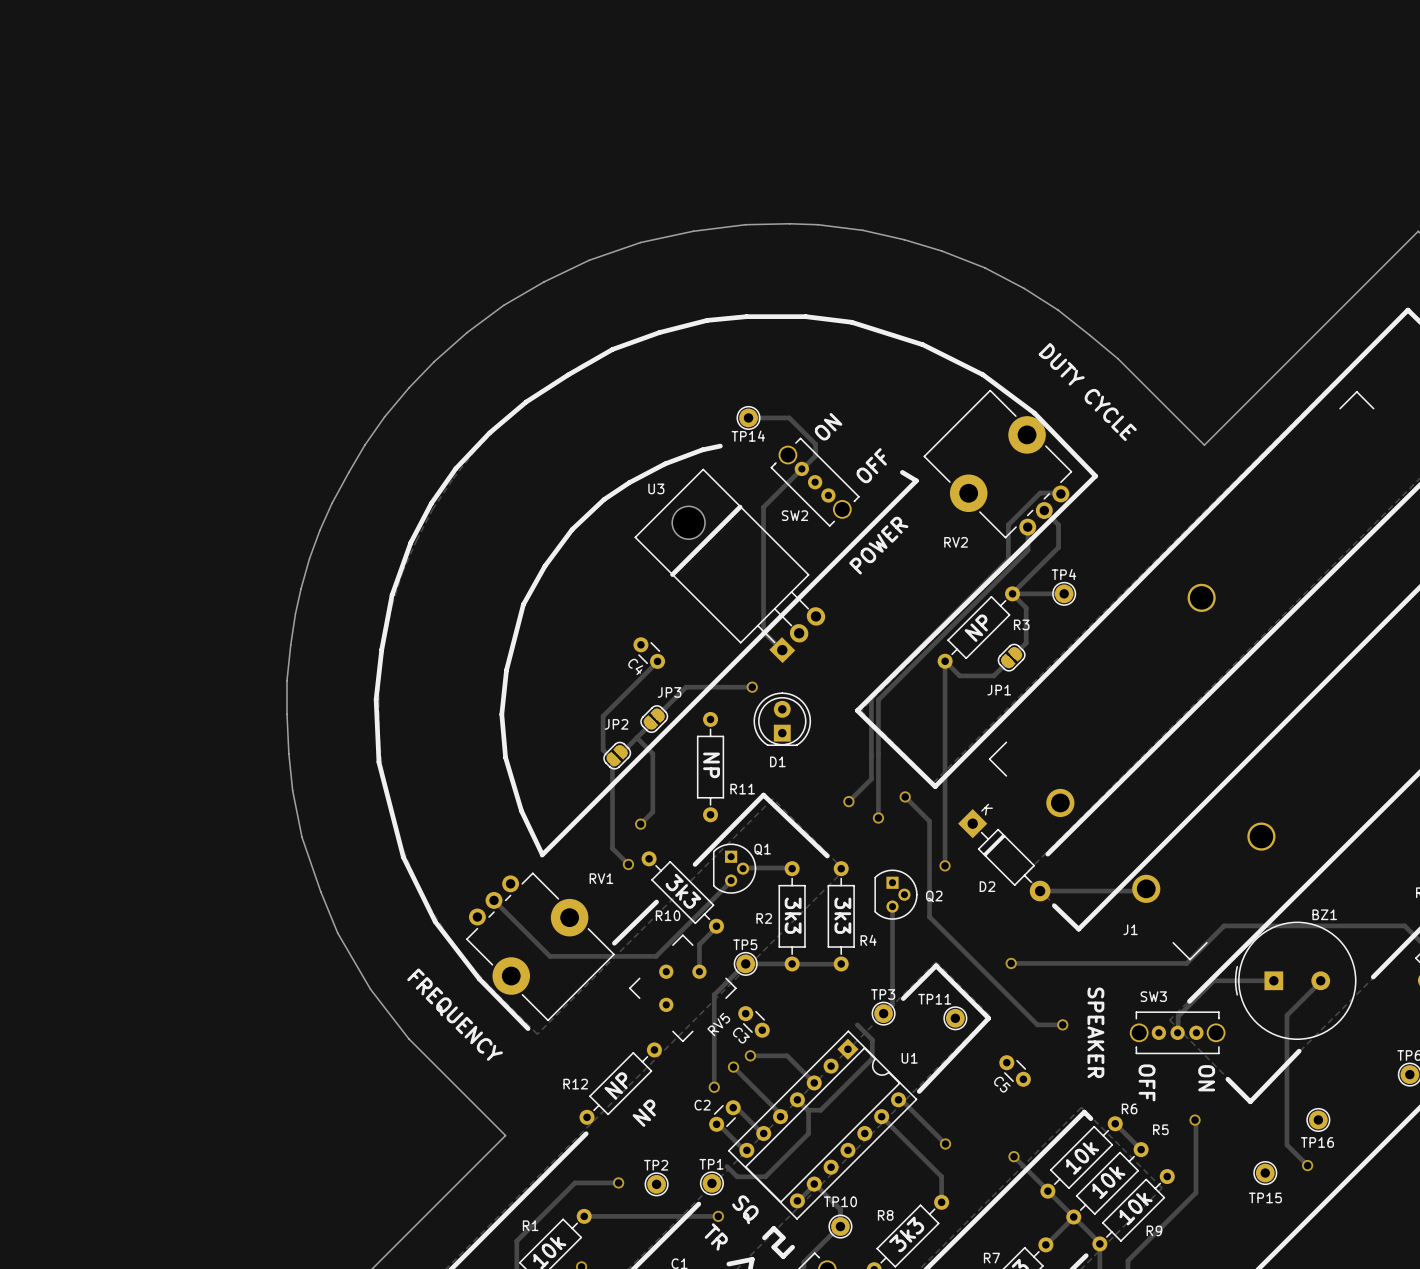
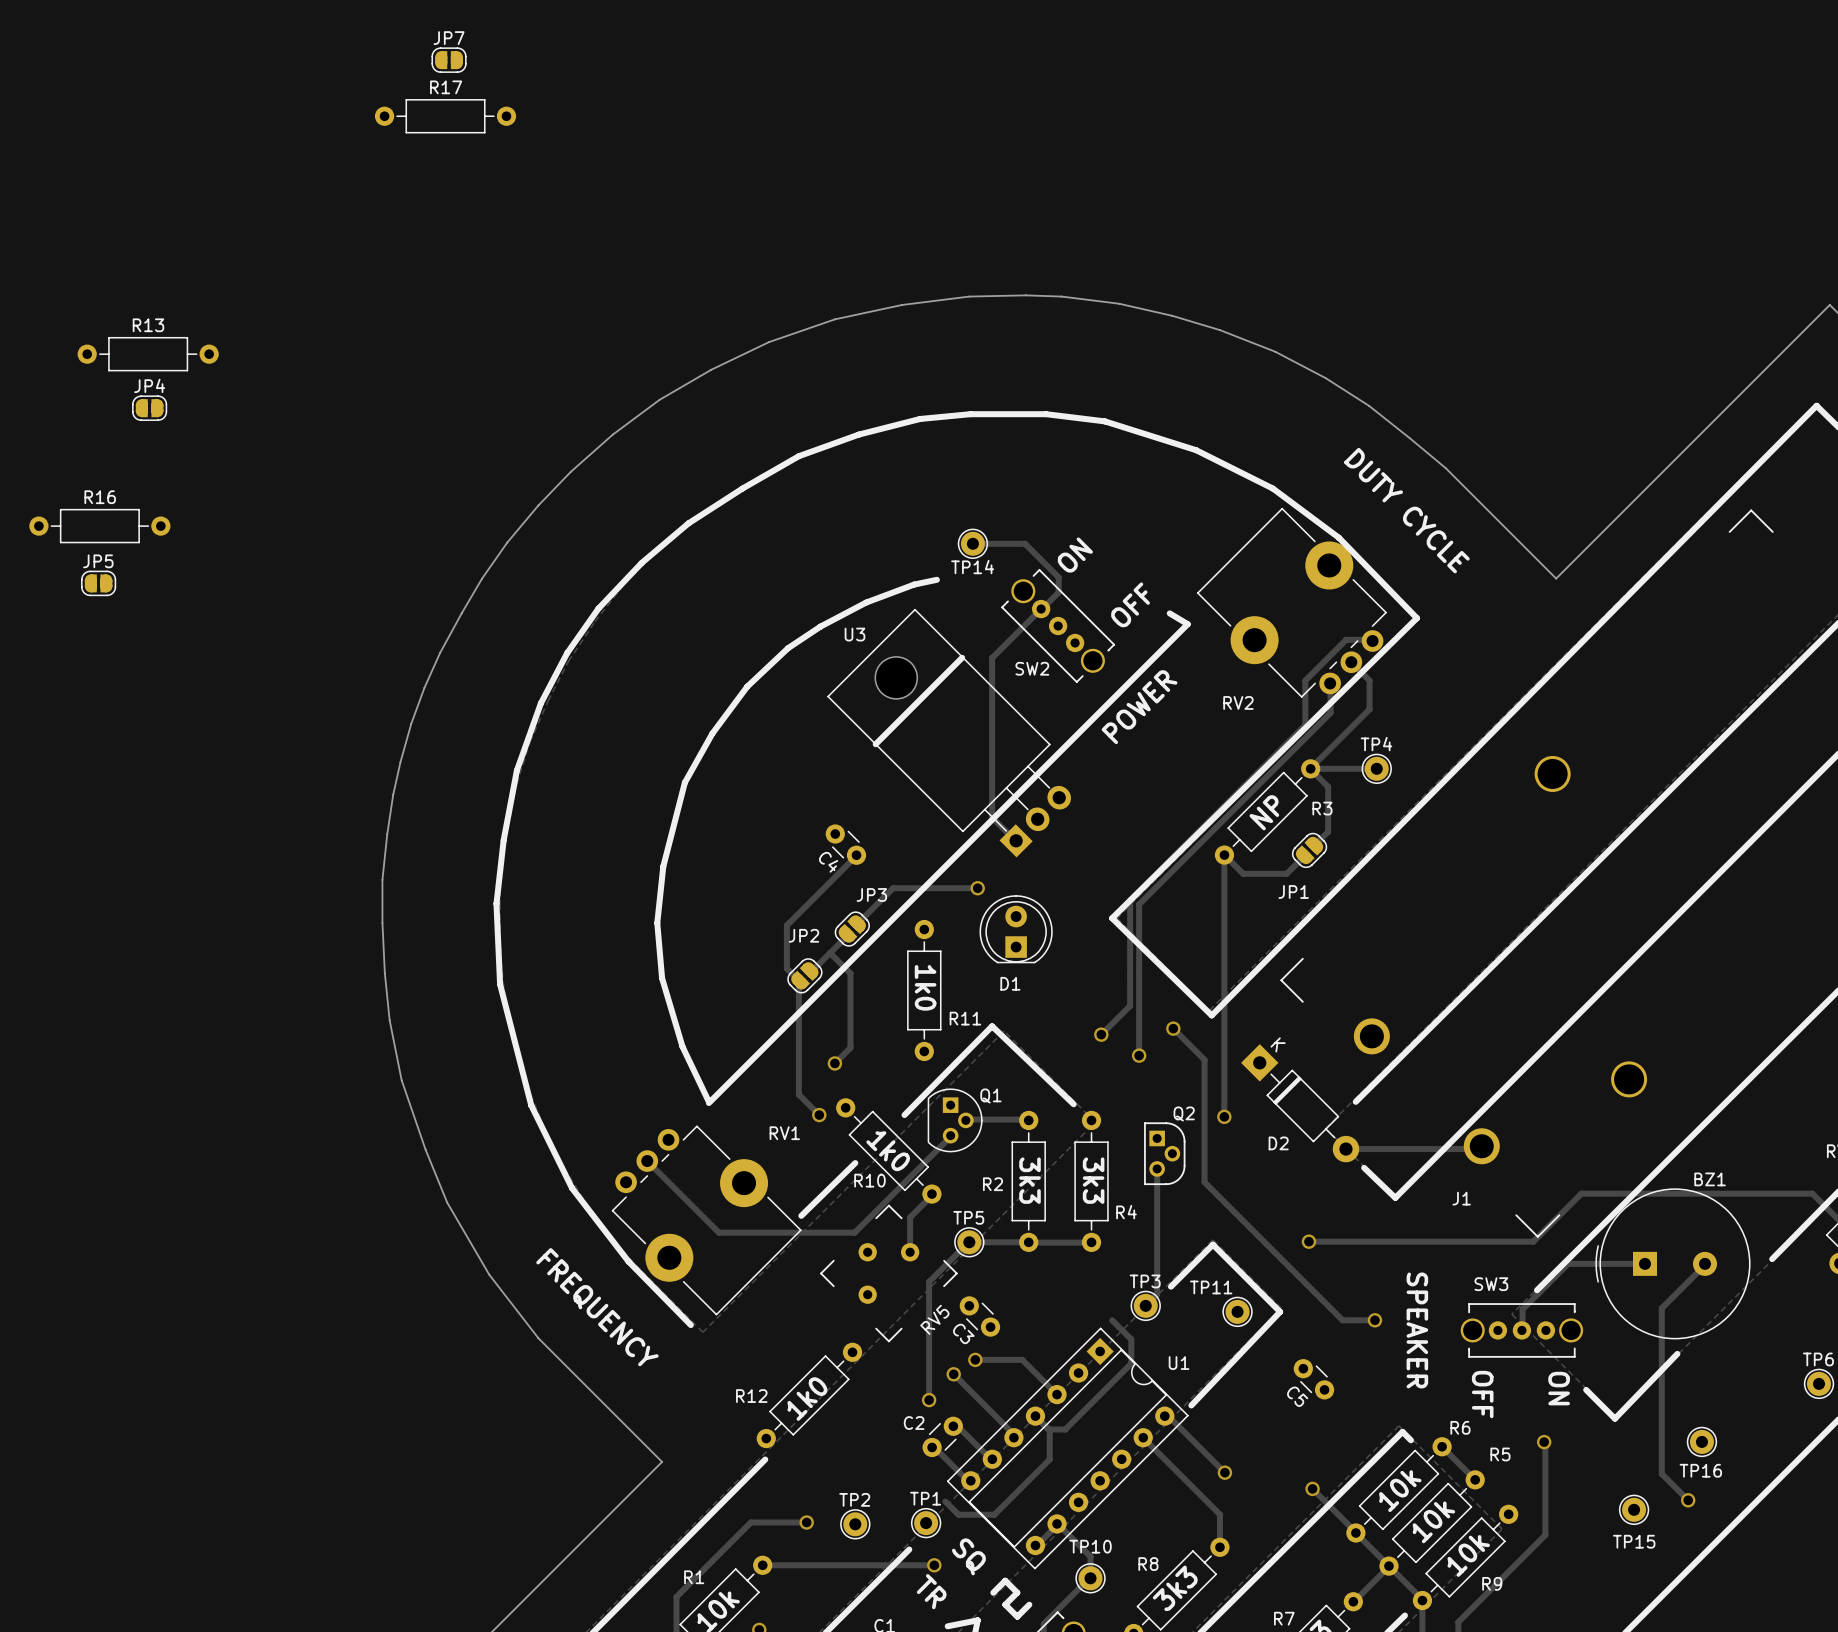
JP7: none -> (449, 60)
R17: none -> (445, 116)
R13: none -> (148, 354)
JP4: none -> (149, 408)
R16: none -> (99, 526)
JP5: none -> (98, 583)
text: NP (711, 765) -> 1k0 (925, 987)
Q2 footprint: [874, 869, 918, 920] -> [1144, 1122, 1186, 1186]
text: 3k3 (683, 891) -> 1k0 (888, 1151)
Q2 name position: Q2 (934, 896) -> Q2 (1184, 1113)
text: NP (616, 1085) -> 1k0 (807, 1399)
text: NP (644, 1113) -> none

